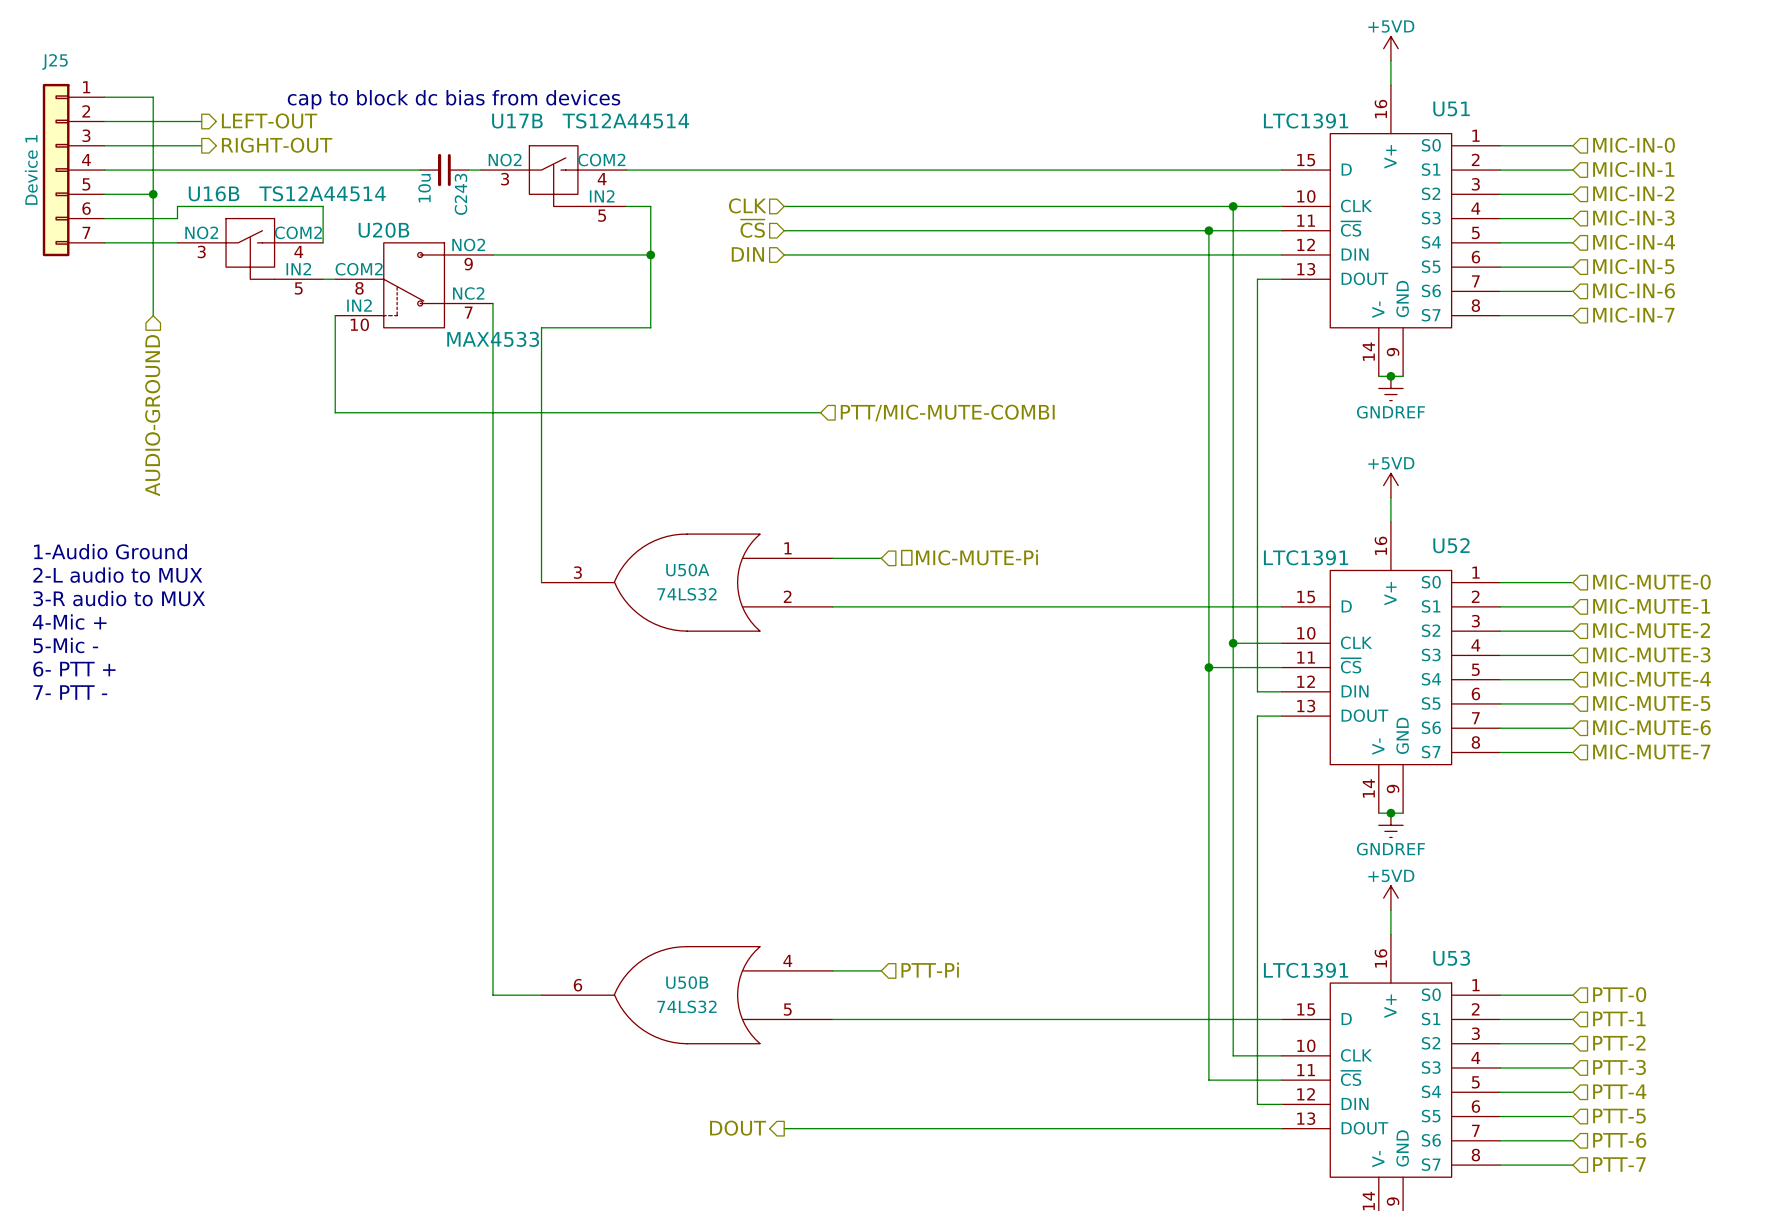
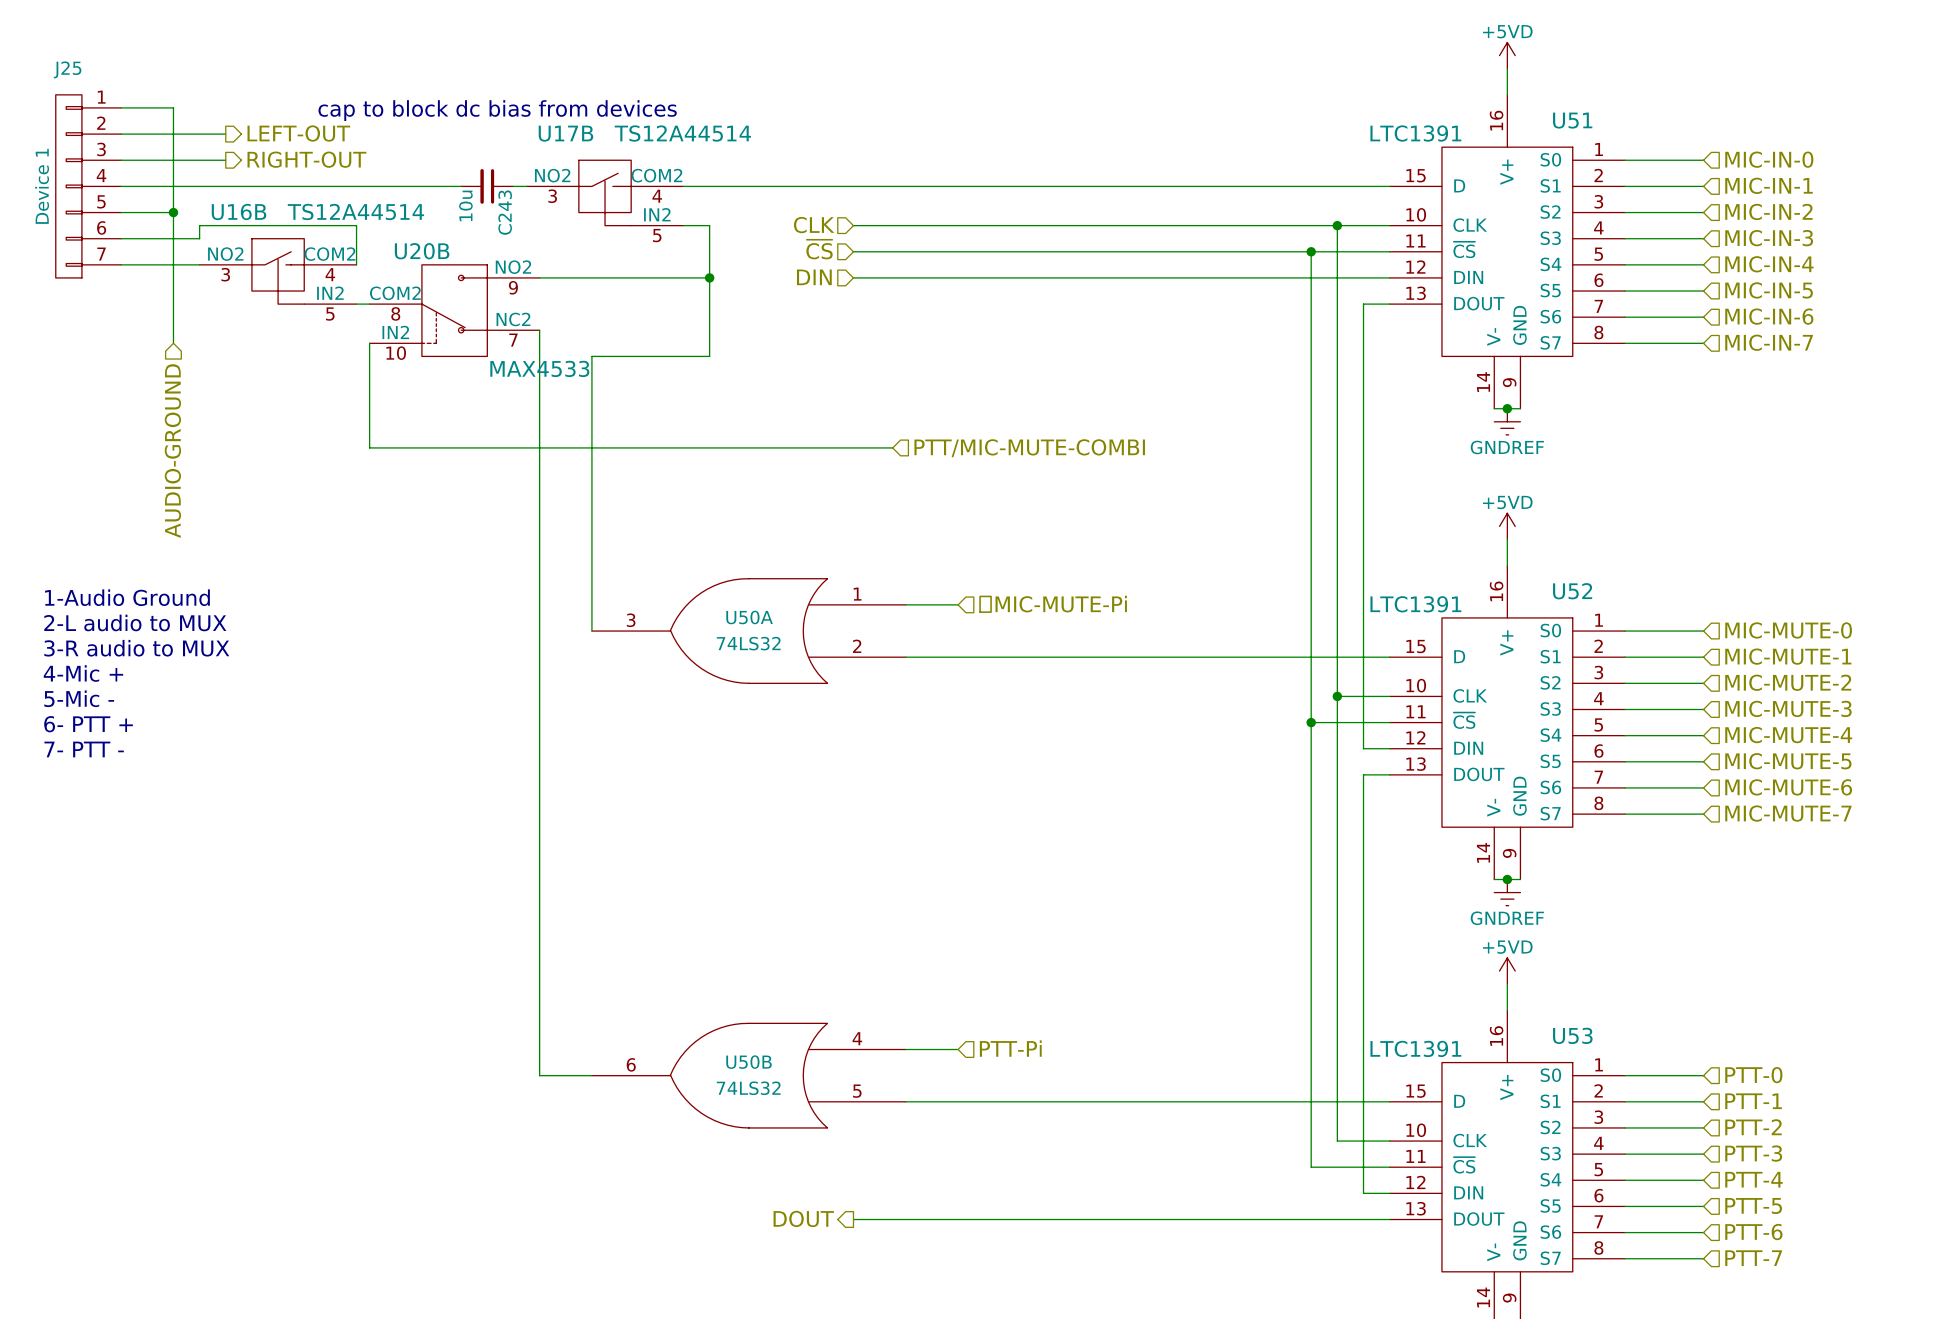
J25 symbol: [42, 83, 105, 257] -> [55, 94, 122, 278]

